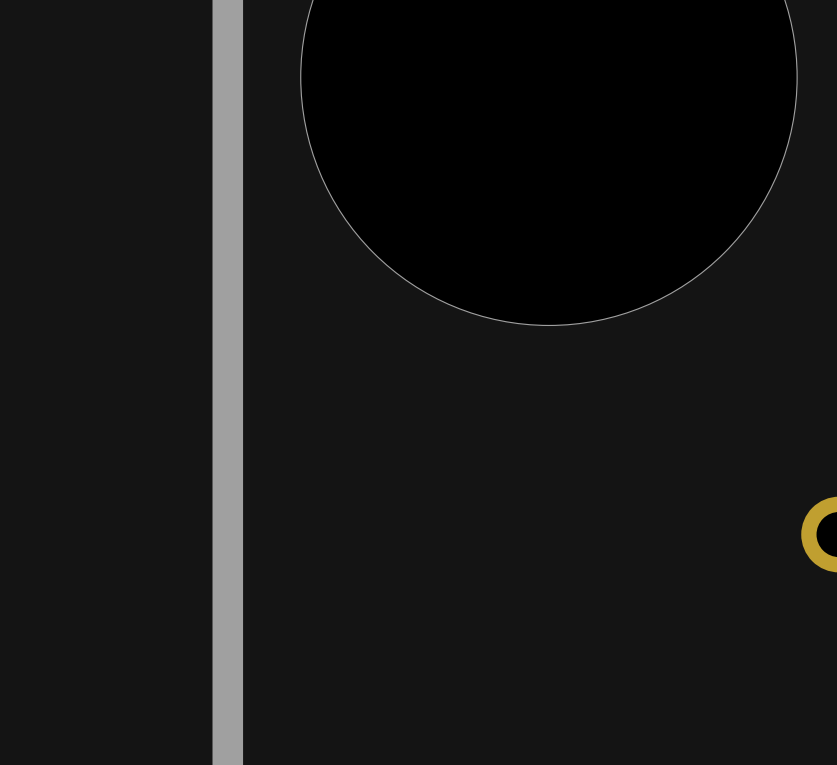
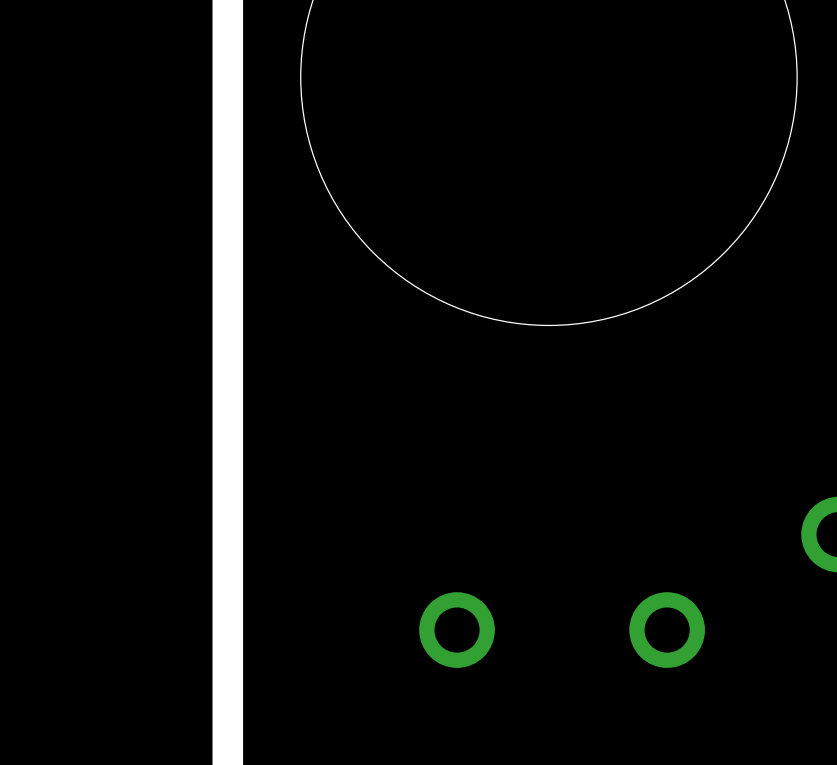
via: none -> (457, 630)
via: none -> (667, 630)

